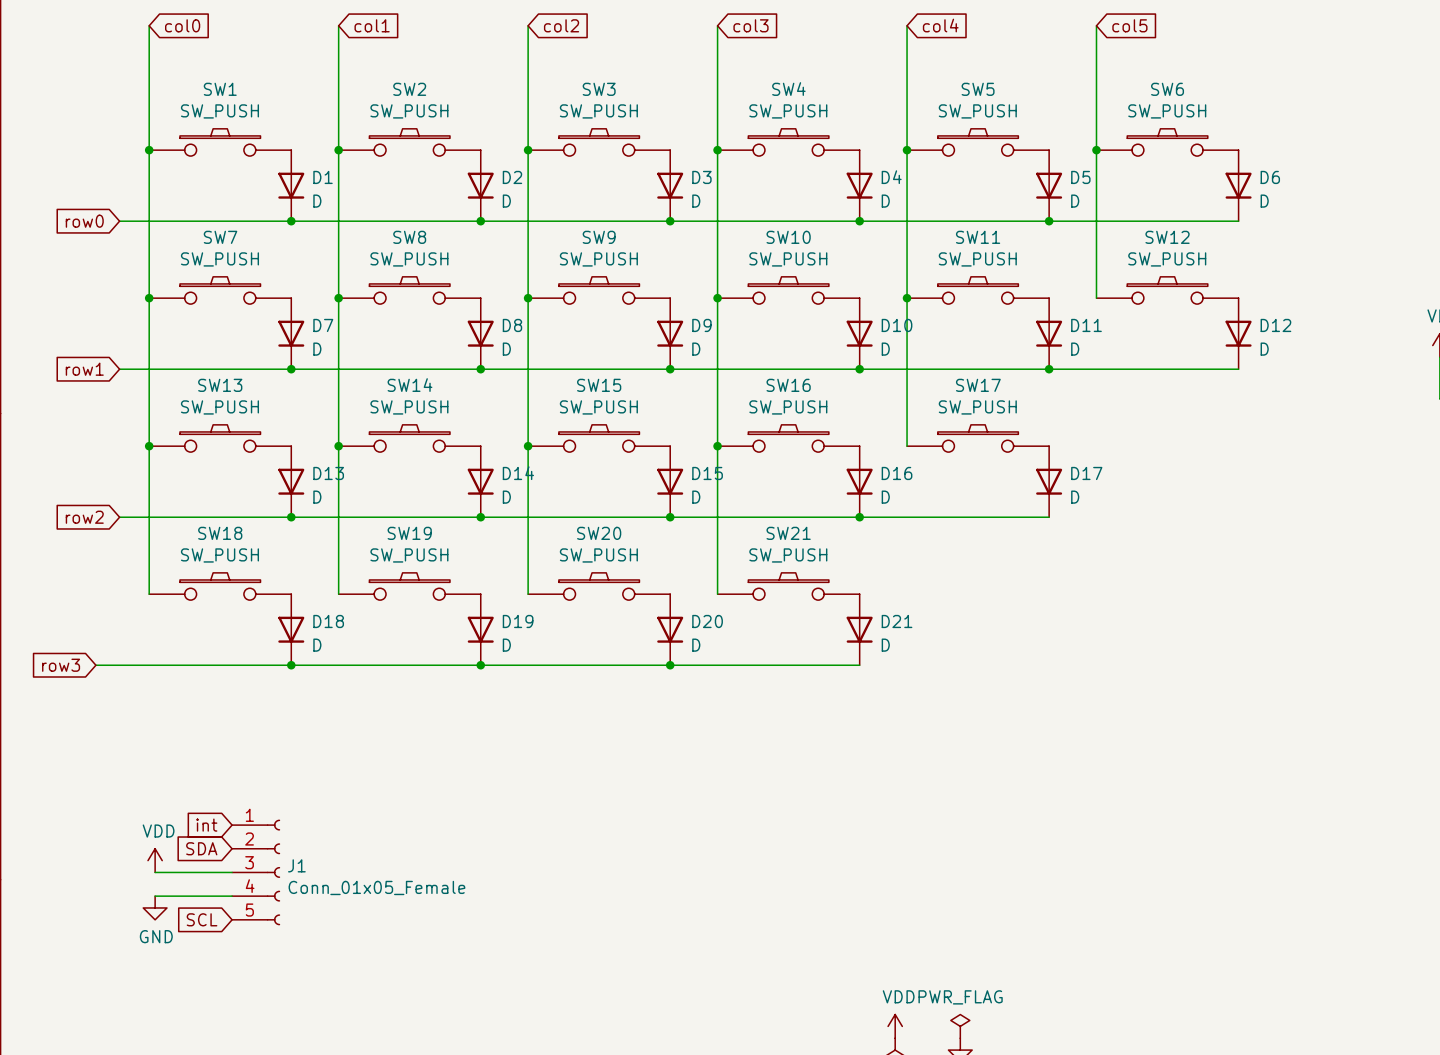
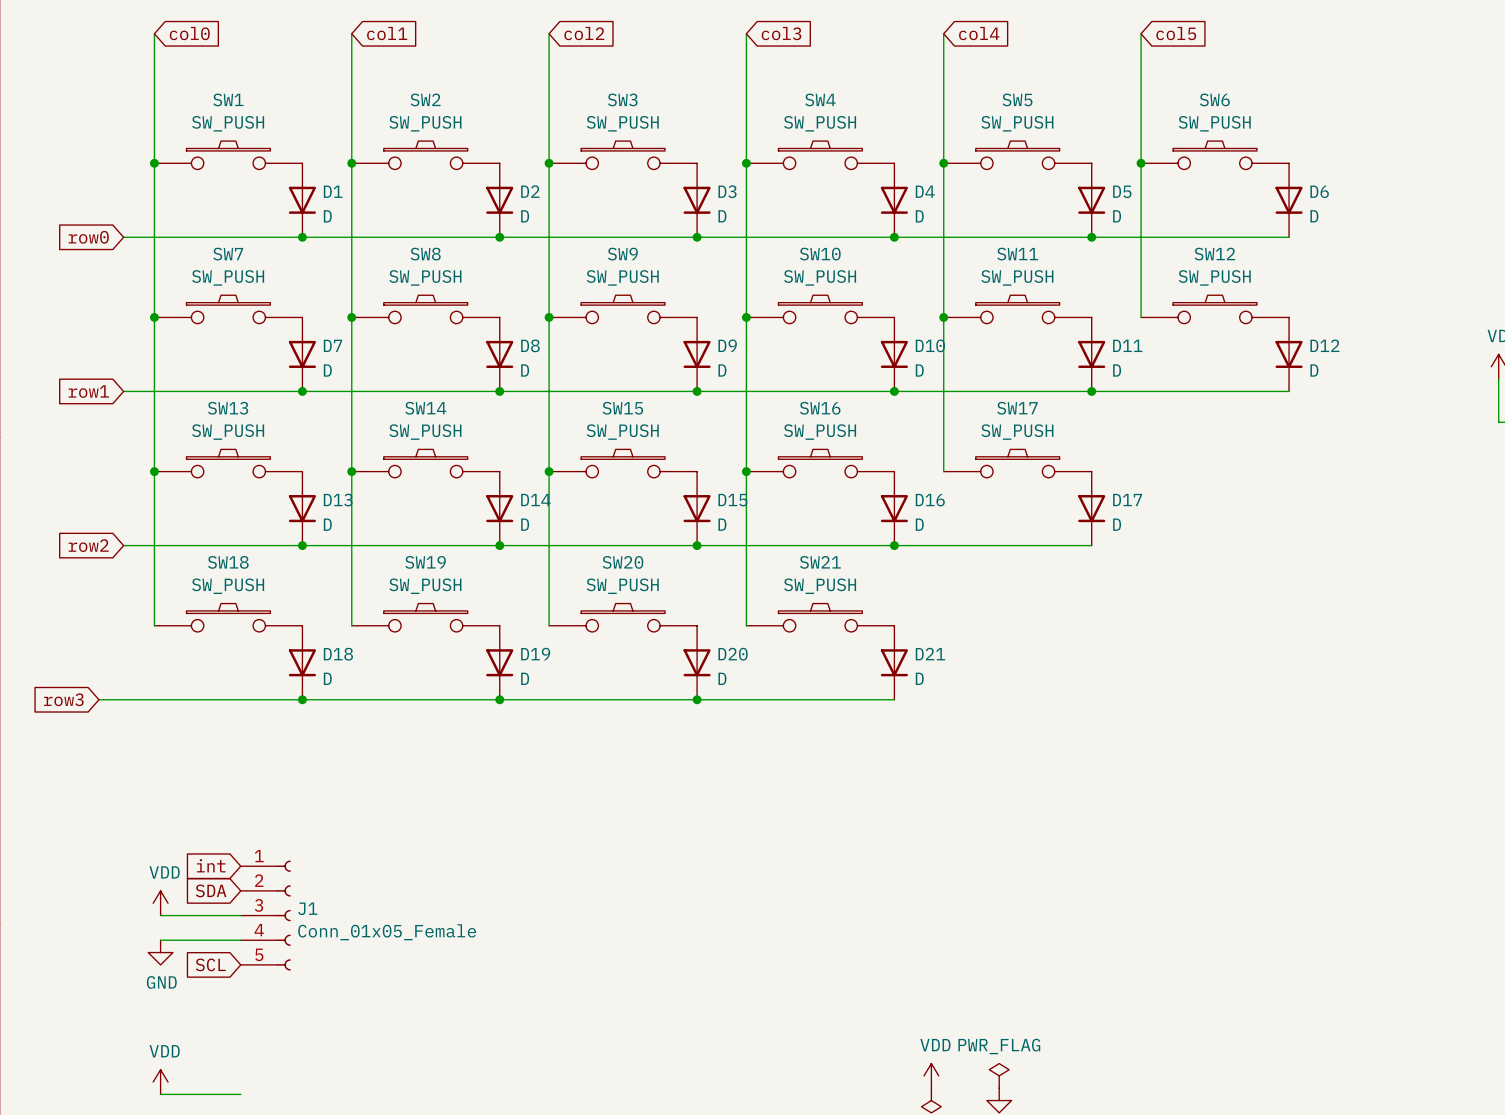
power symbol: none -> VDD (160, 1082)
wire: none -> (160, 1094) (240, 1094)

